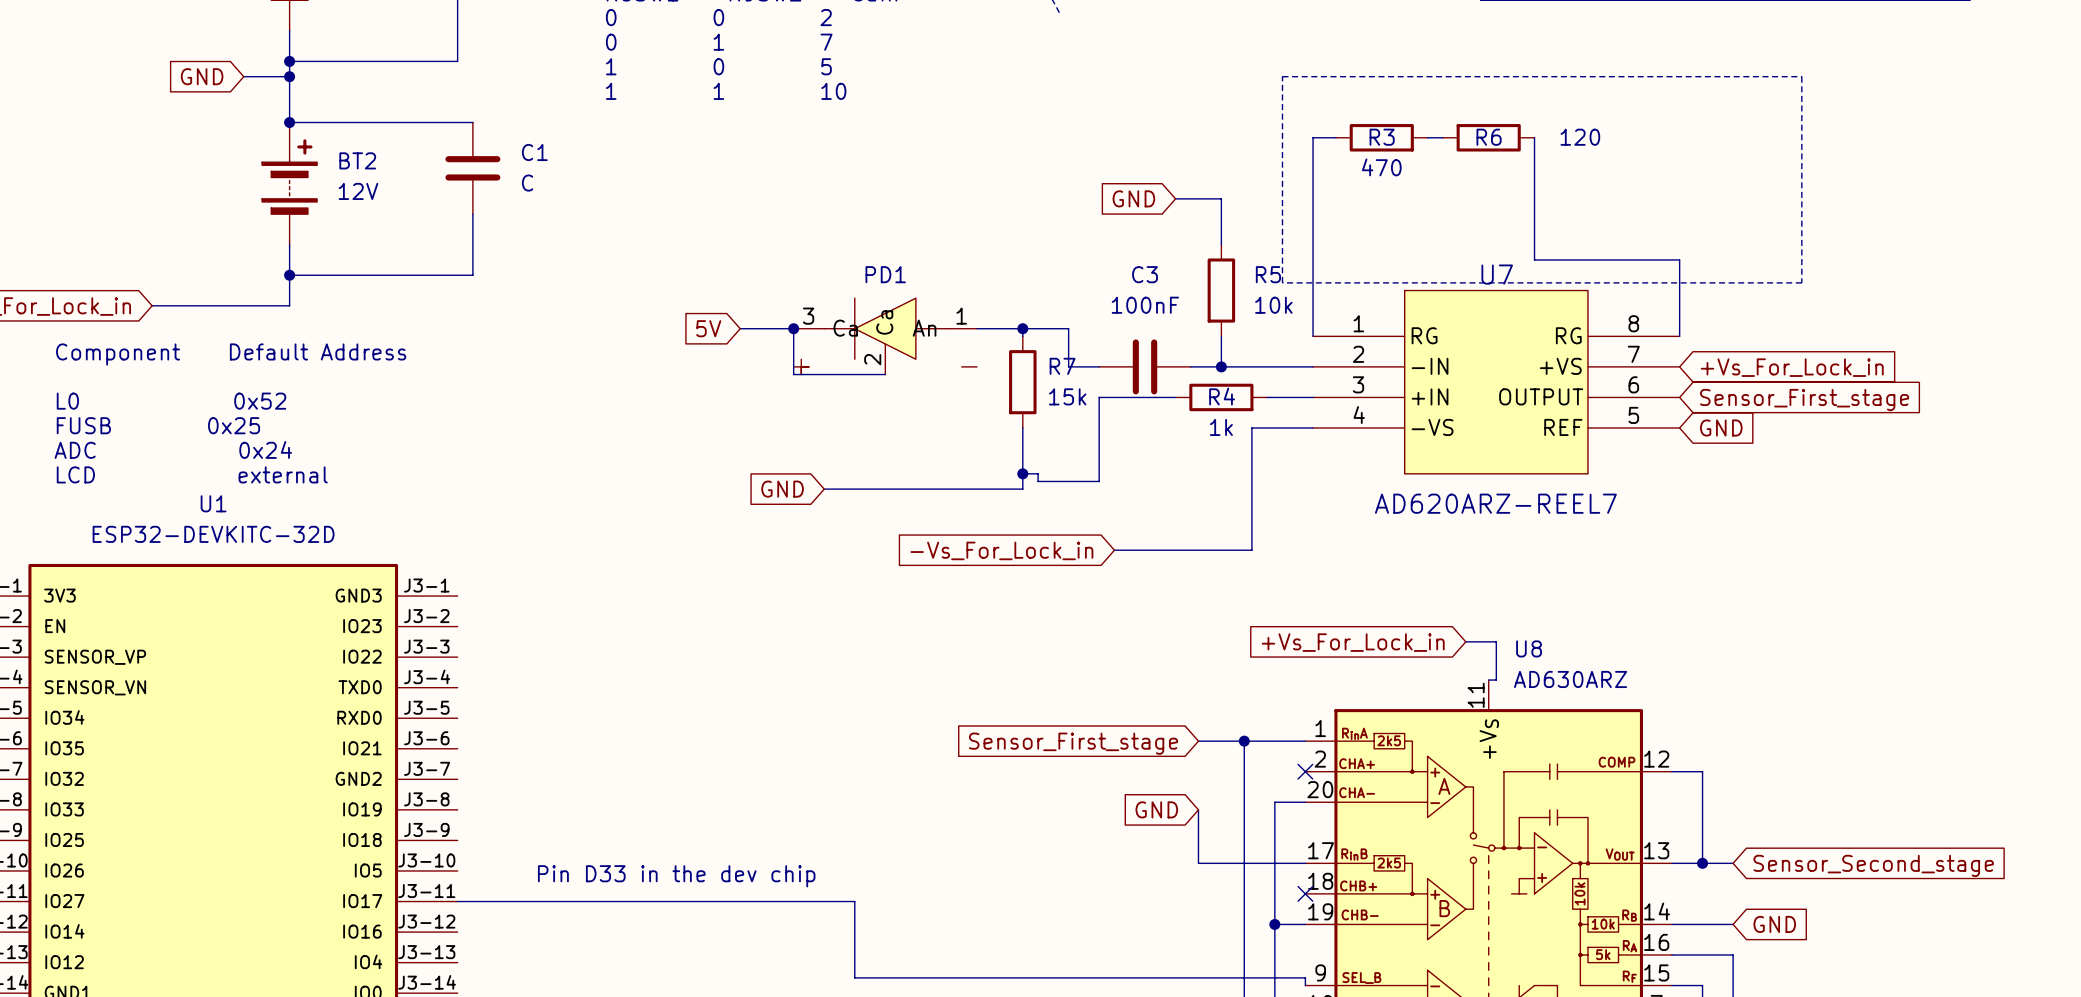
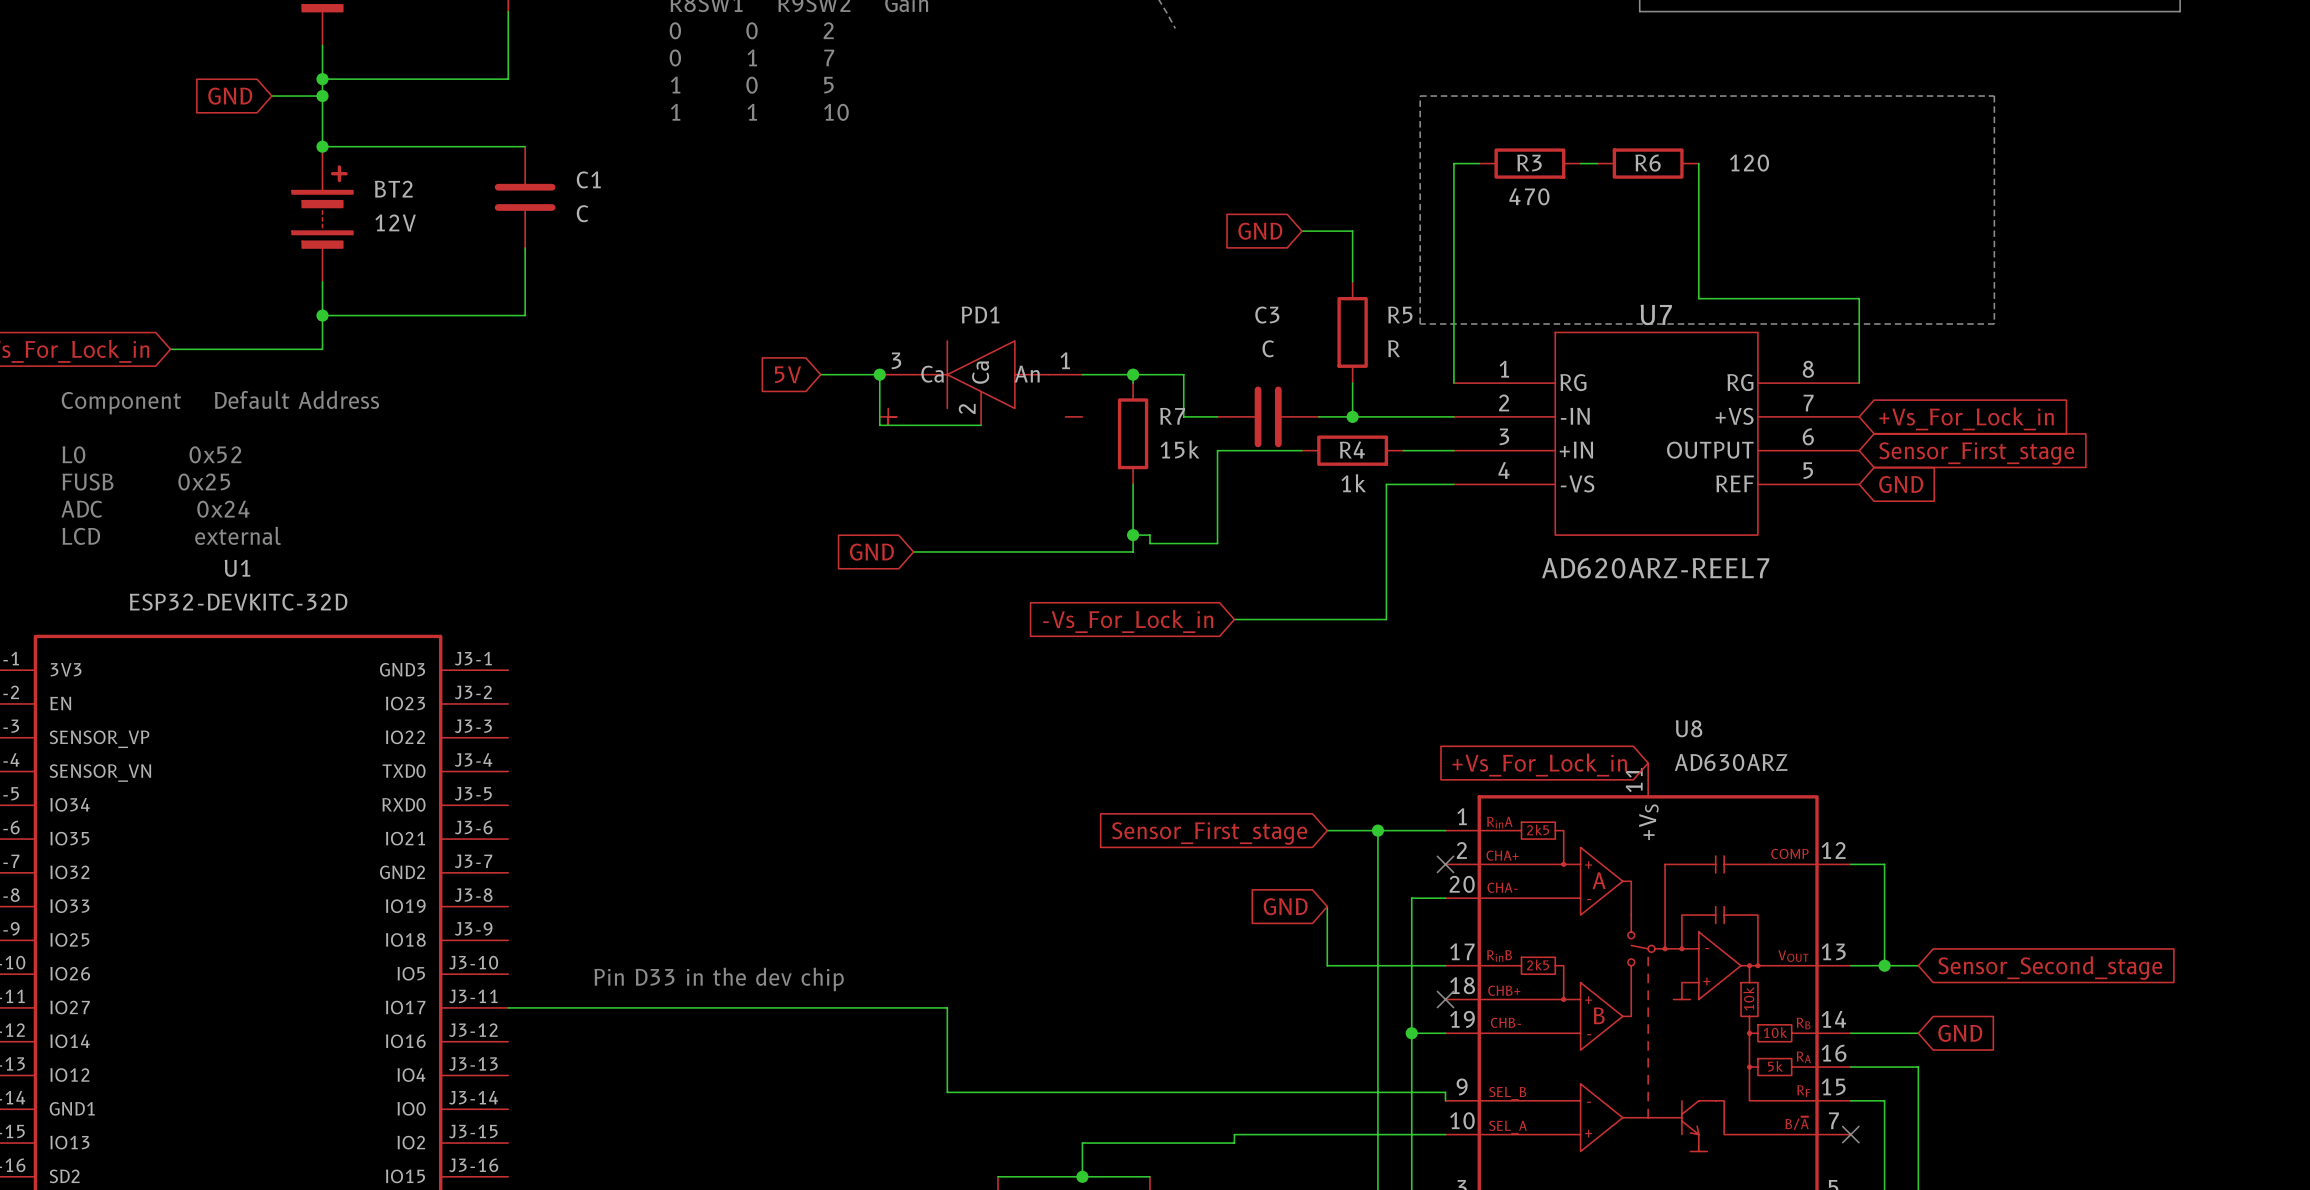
C3 value: 100nF (1145, 305) -> C (1268, 348)
R5 value: 10k (1273, 305) -> R (1394, 348)
wire: (1465, 641) (1496, 641) (1496, 680) (1488, 680) -> none
global label position: +Vs_For_Lock_in (1353, 642) -> +Vs_For_Lock_in (1539, 765)

